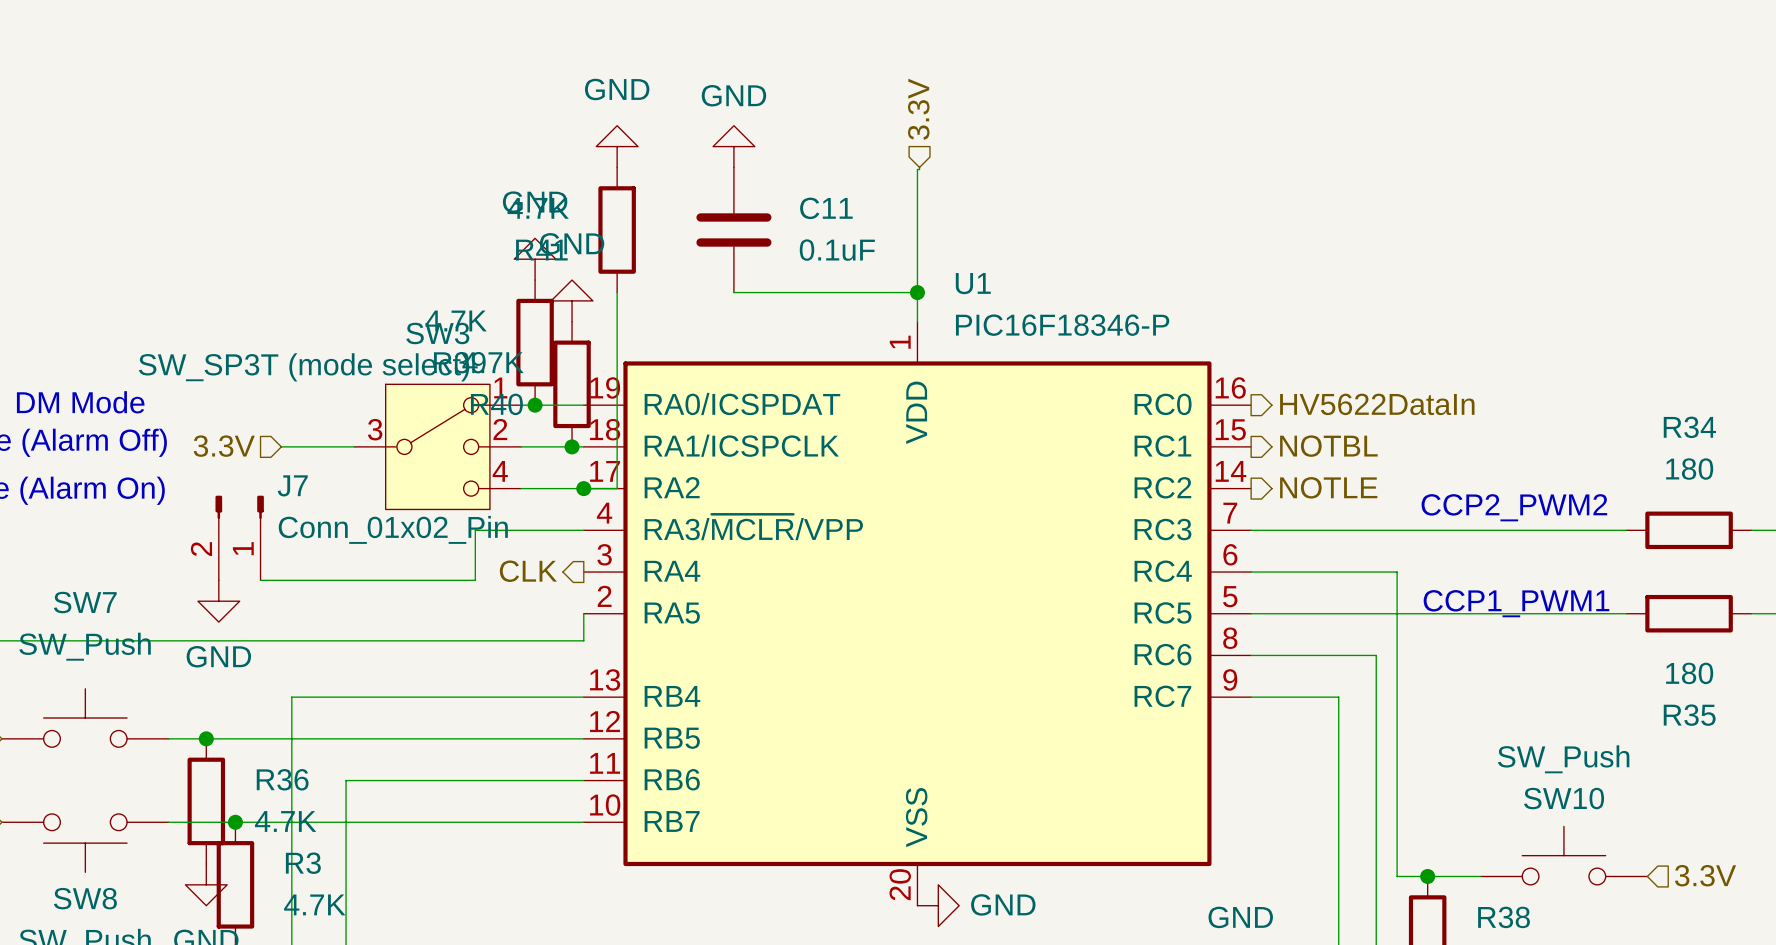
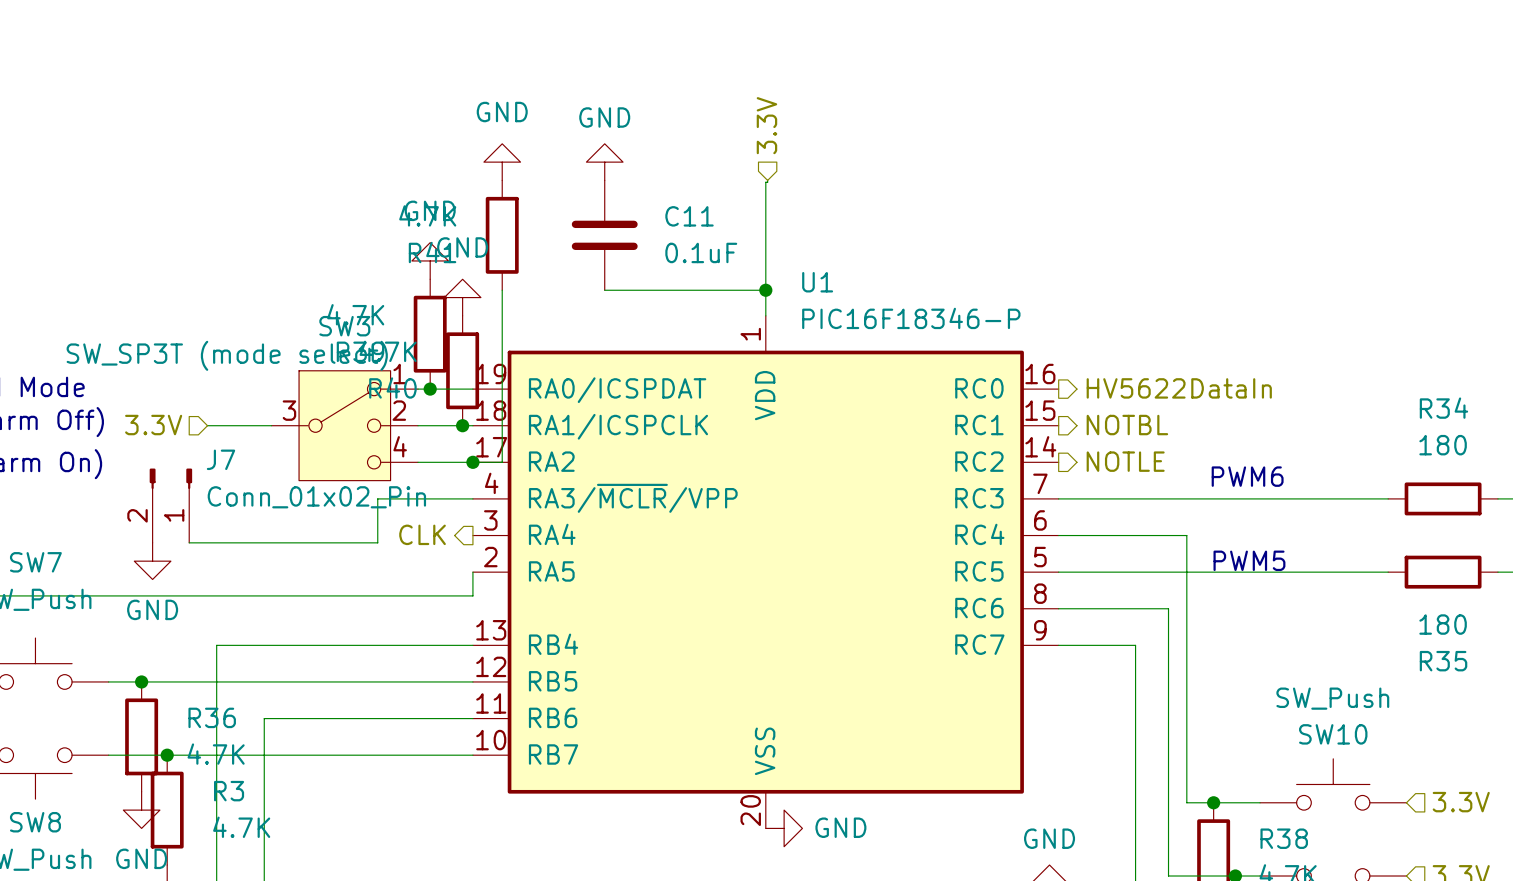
text: CCP2_PWM2 (1514, 507) -> PWM6 (1247, 476)
text: CCP1_PWM1 (1516, 603) -> PWM5 (1249, 560)

